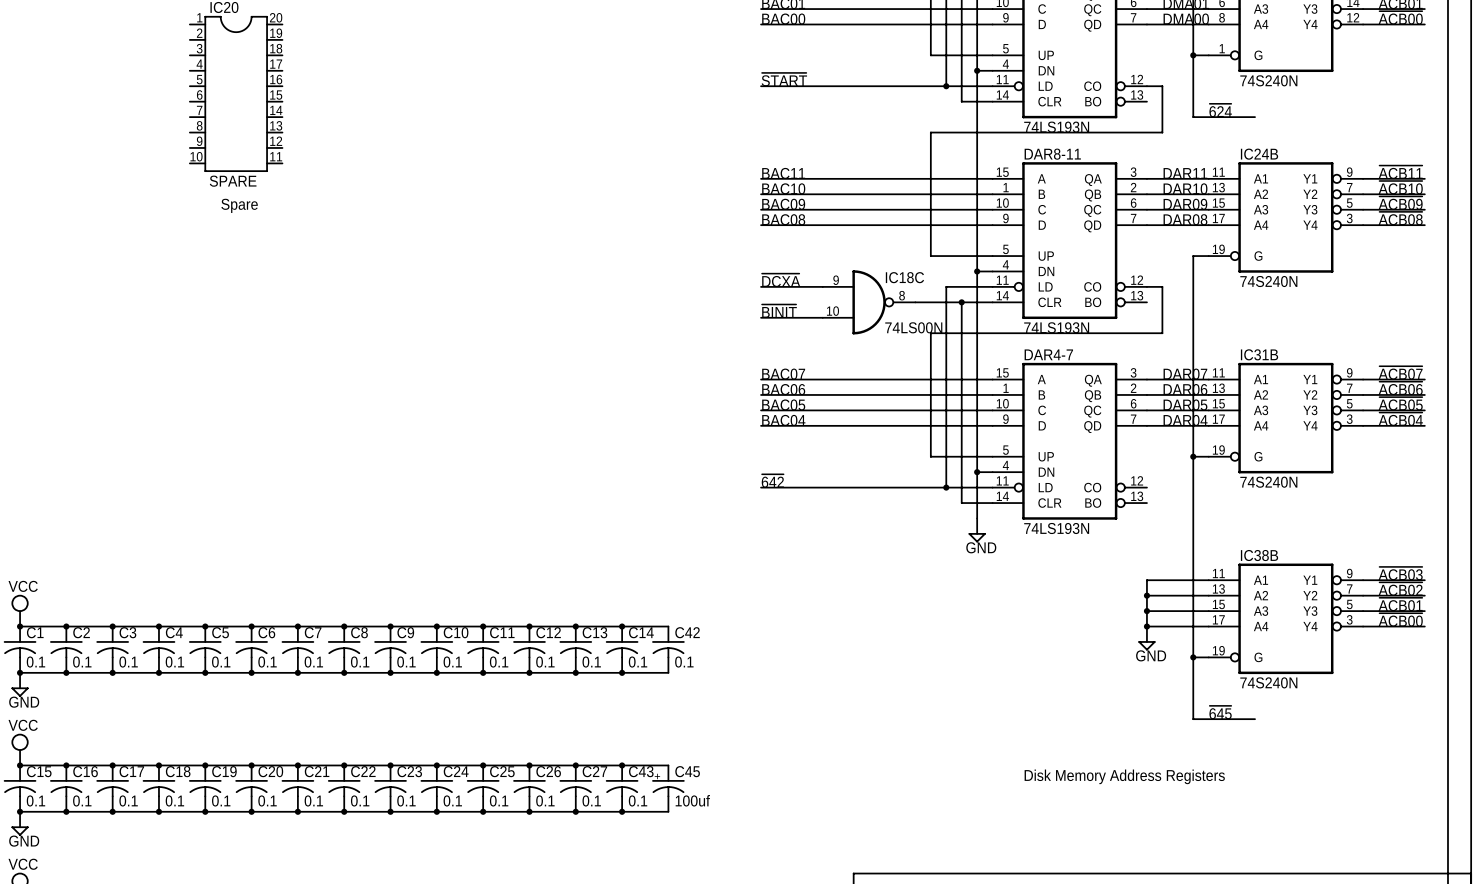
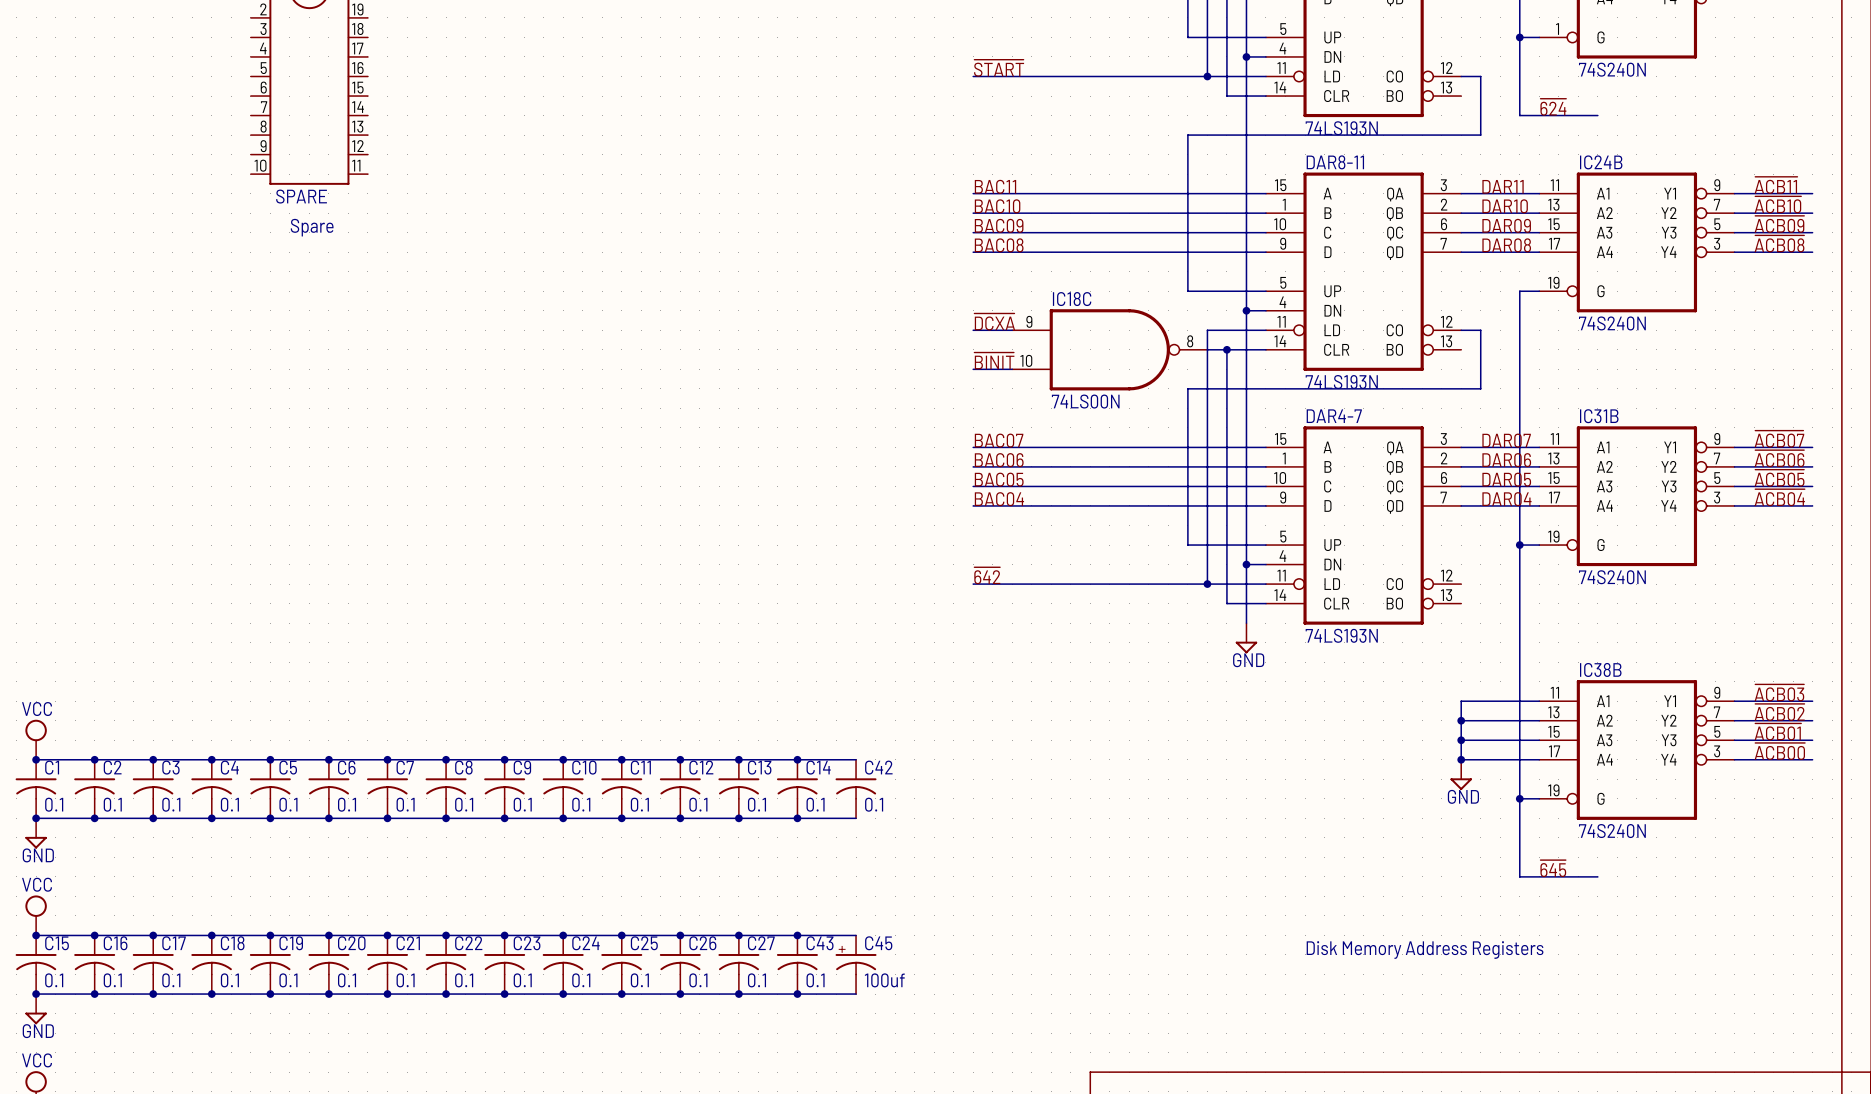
IC18C symbol: [822, 270, 916, 335] -> [1012, 309, 1208, 391]
IC18C name position: IC18C (904, 277) -> IC18C (1072, 299)
IC18C value position: 74LS00N (913, 327) -> 74LS00N (1085, 401)

